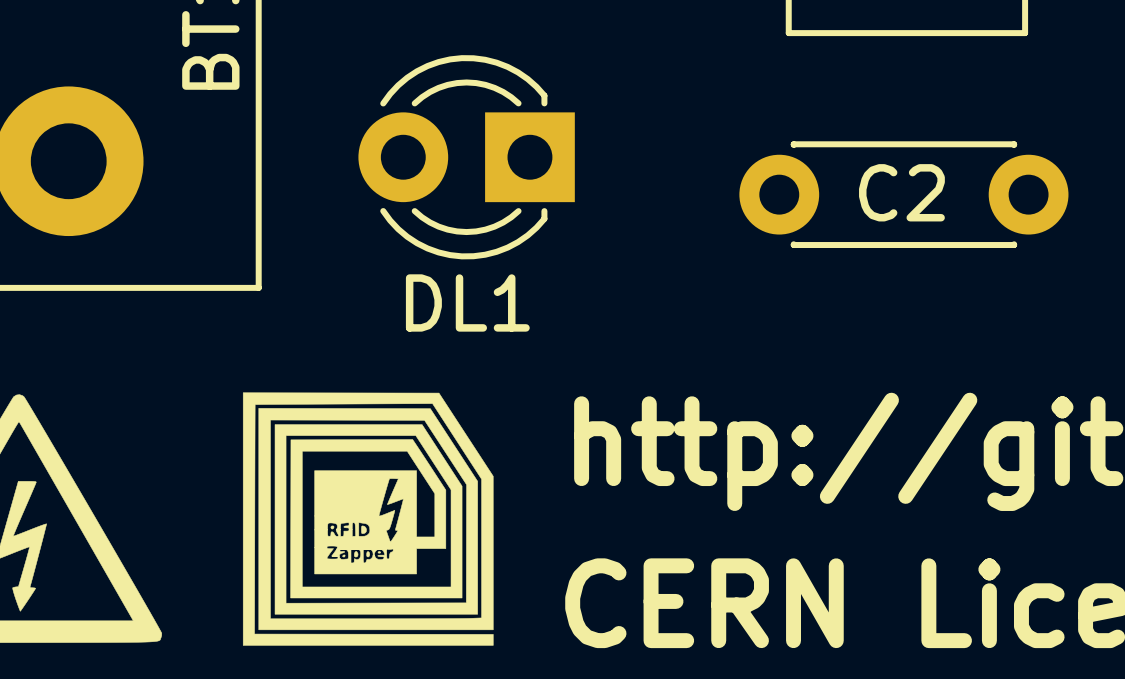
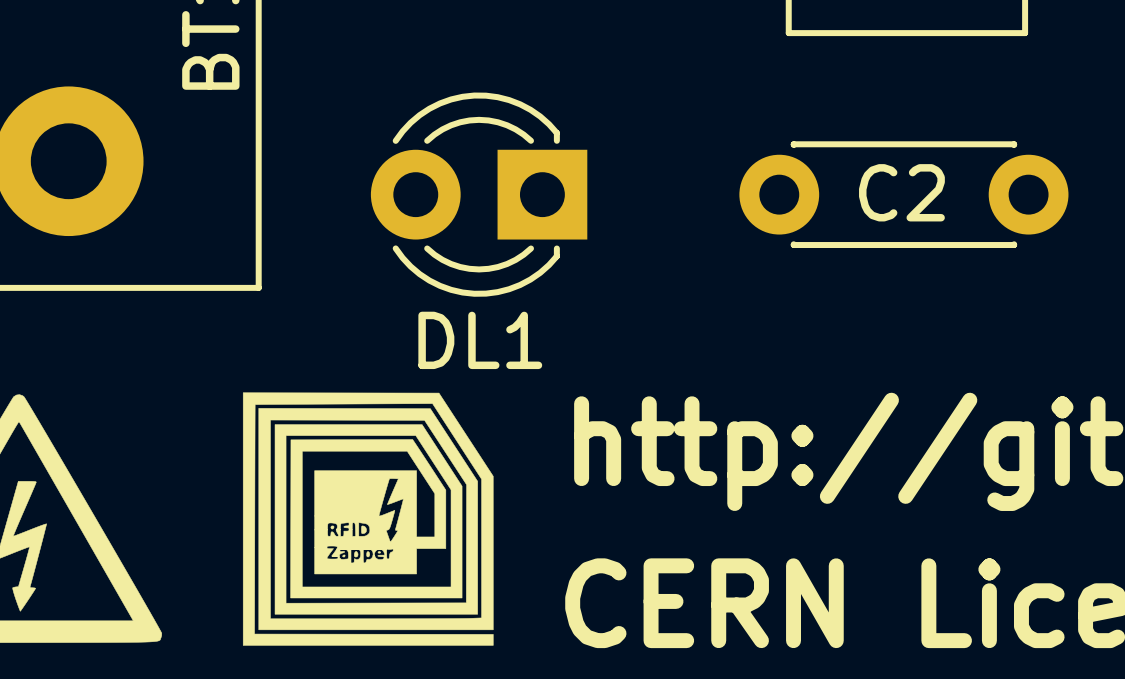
DL1 position: (466, 157) -> (479, 194)

